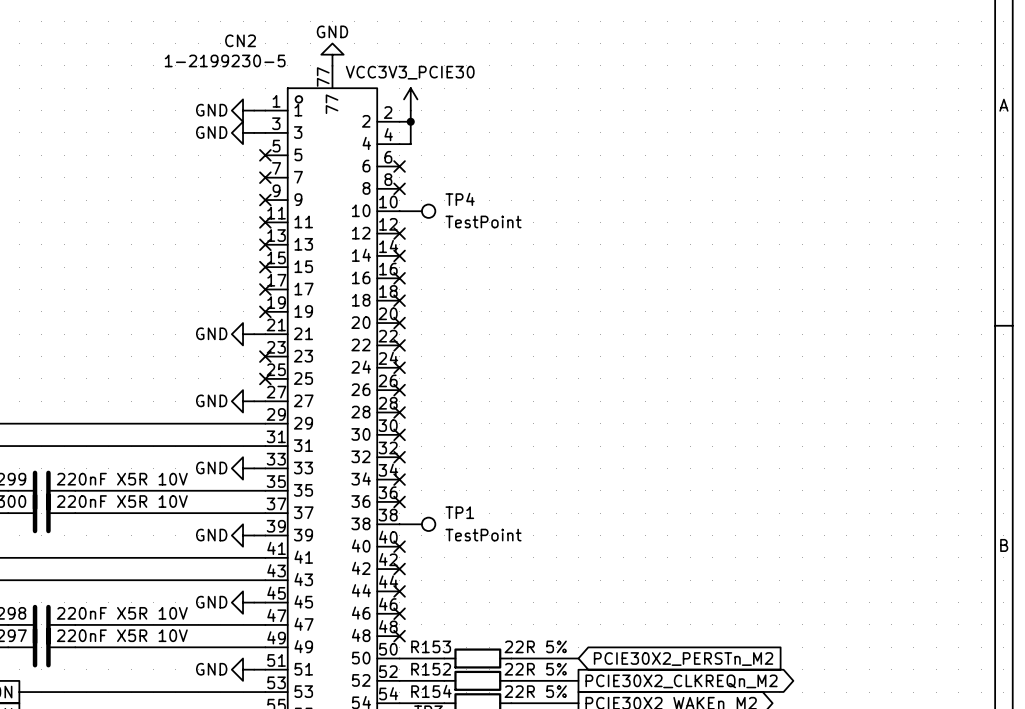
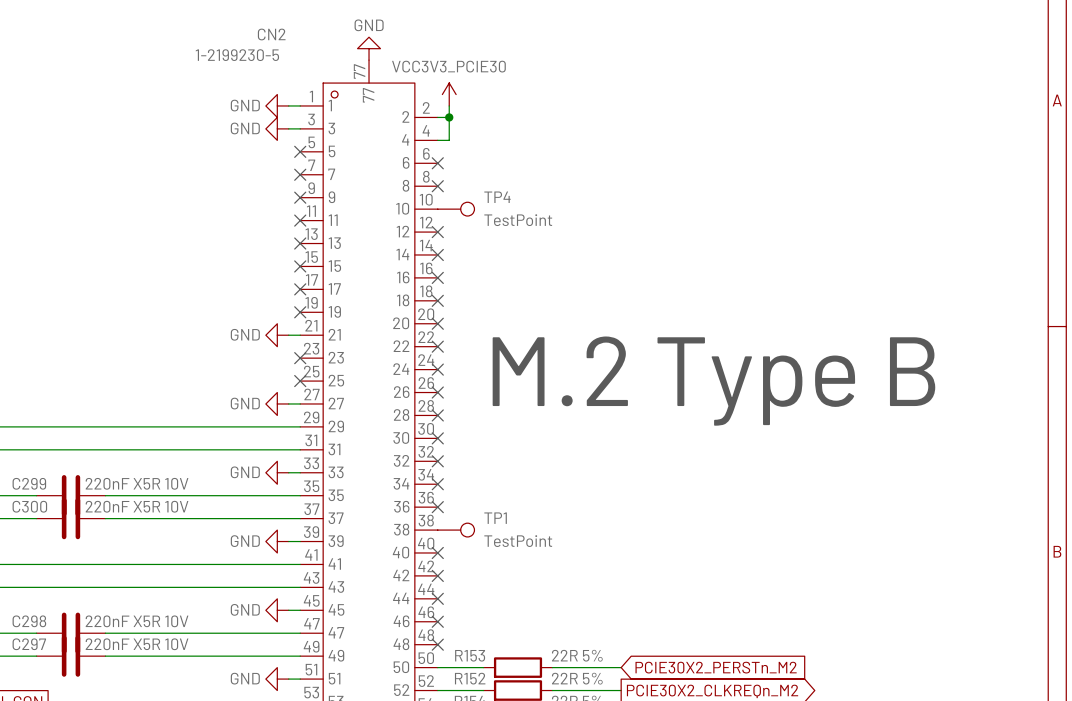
text: none -> M.2 Type B (713, 381)

